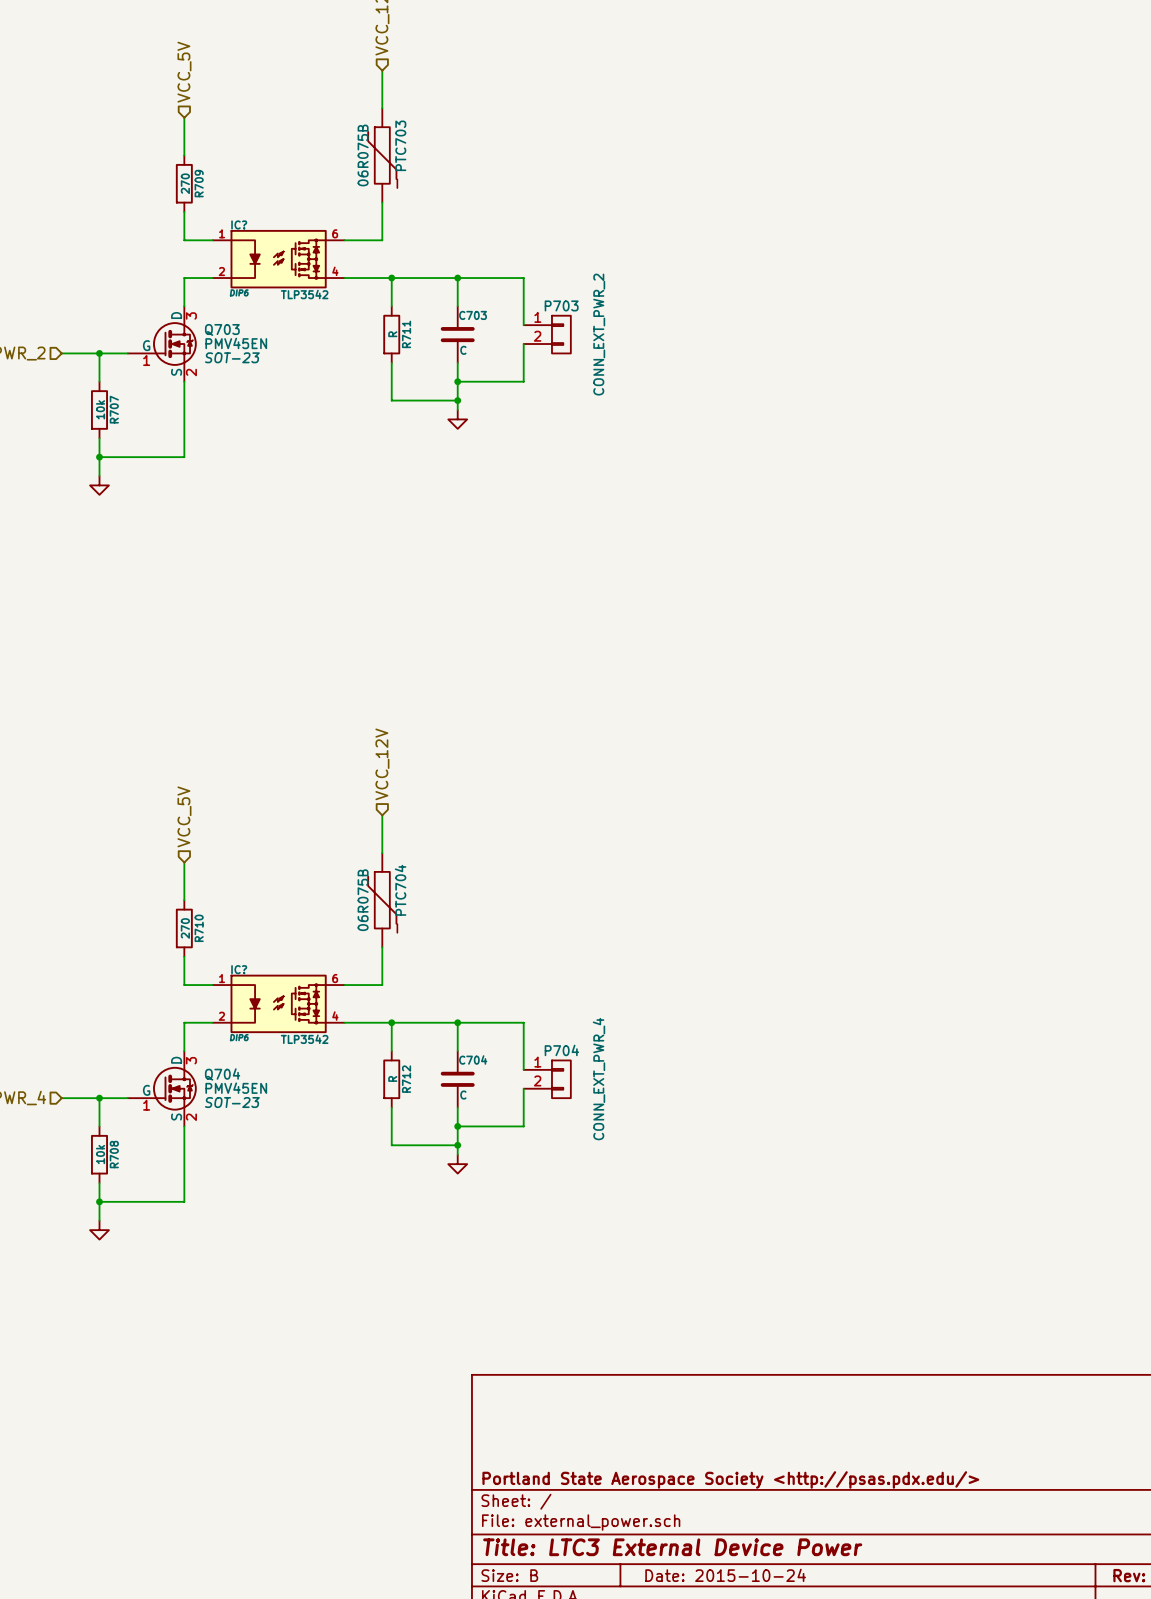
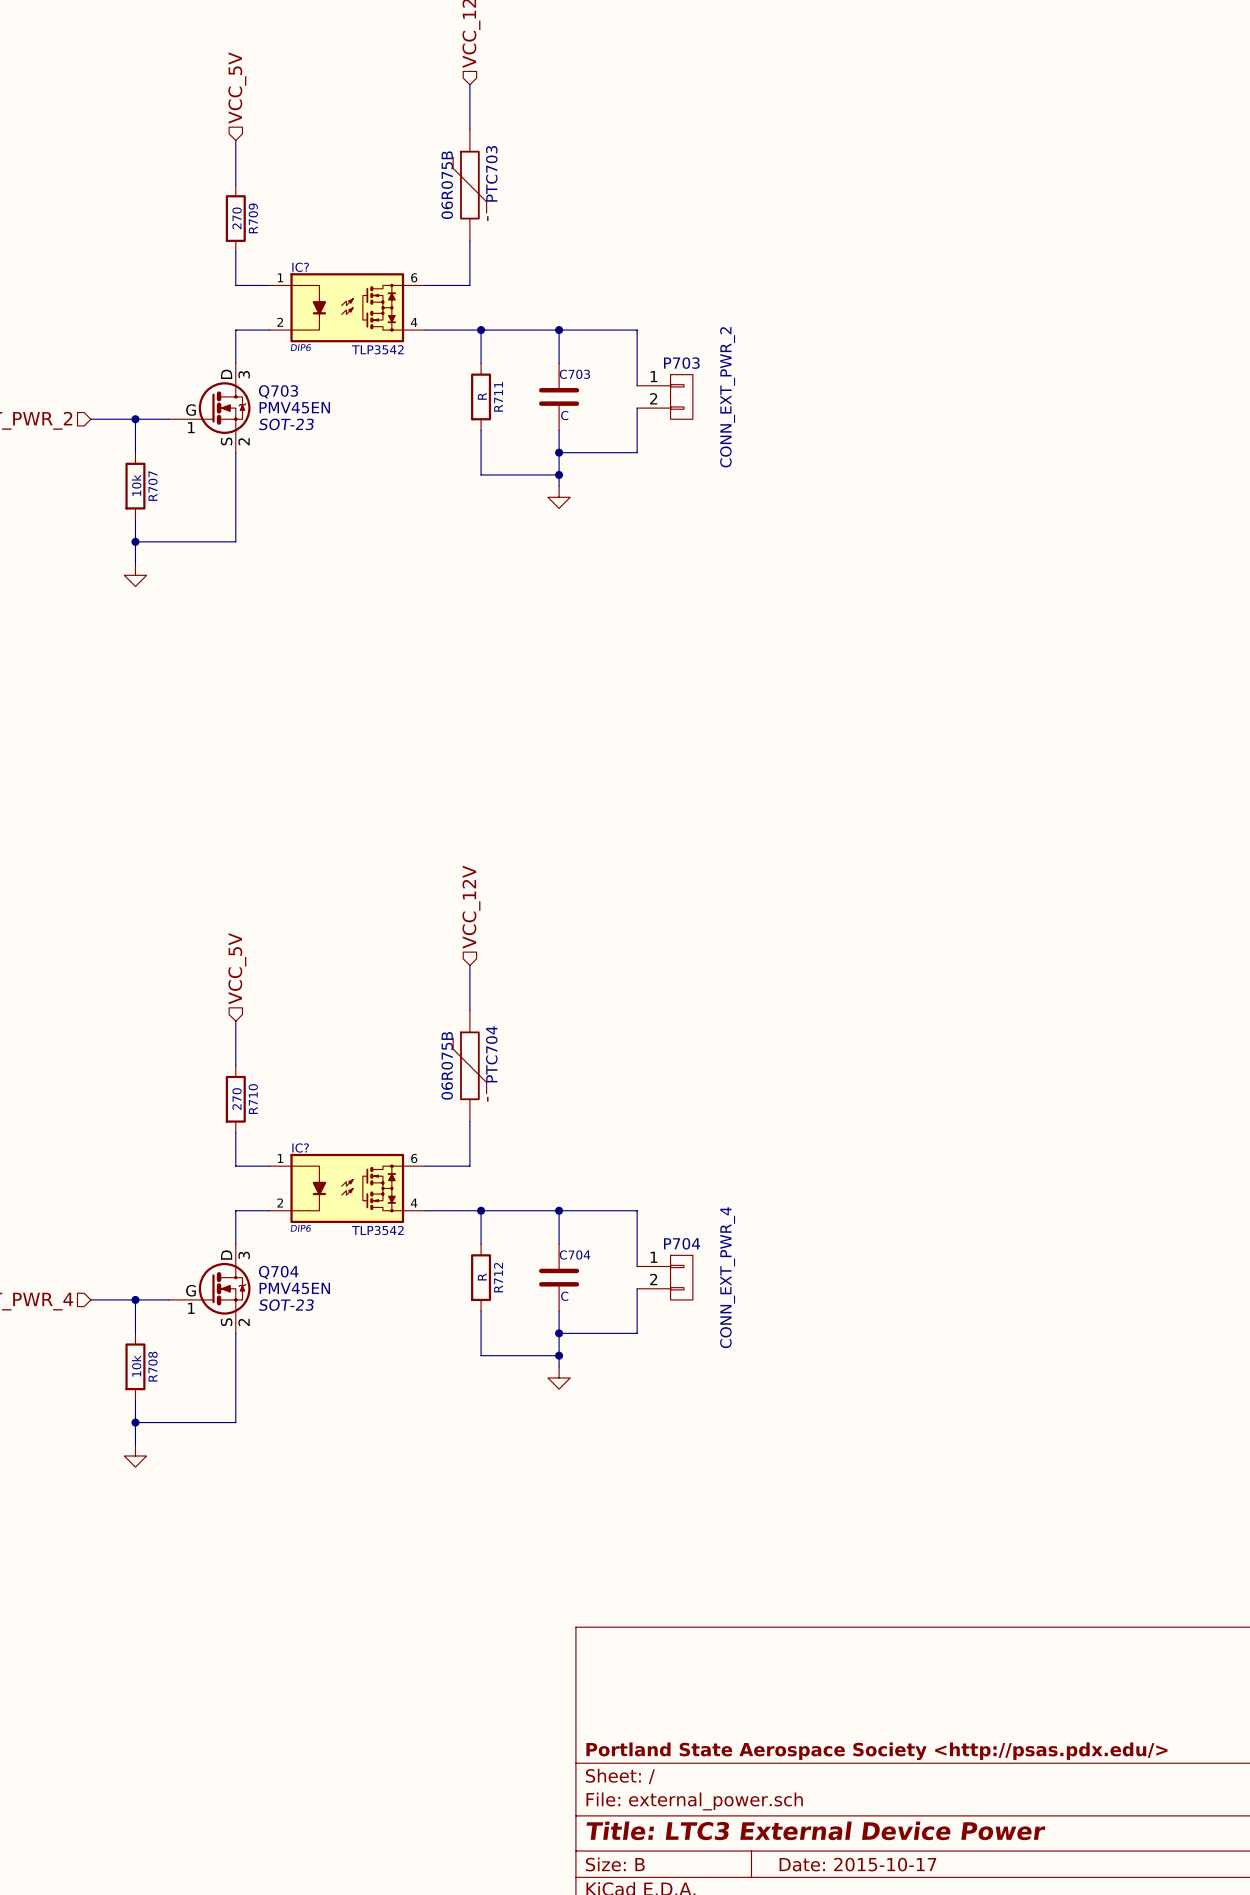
title block: Date: 2015-10-24 (725, 1575) -> Date: 2015-10-17 (857, 1864)

